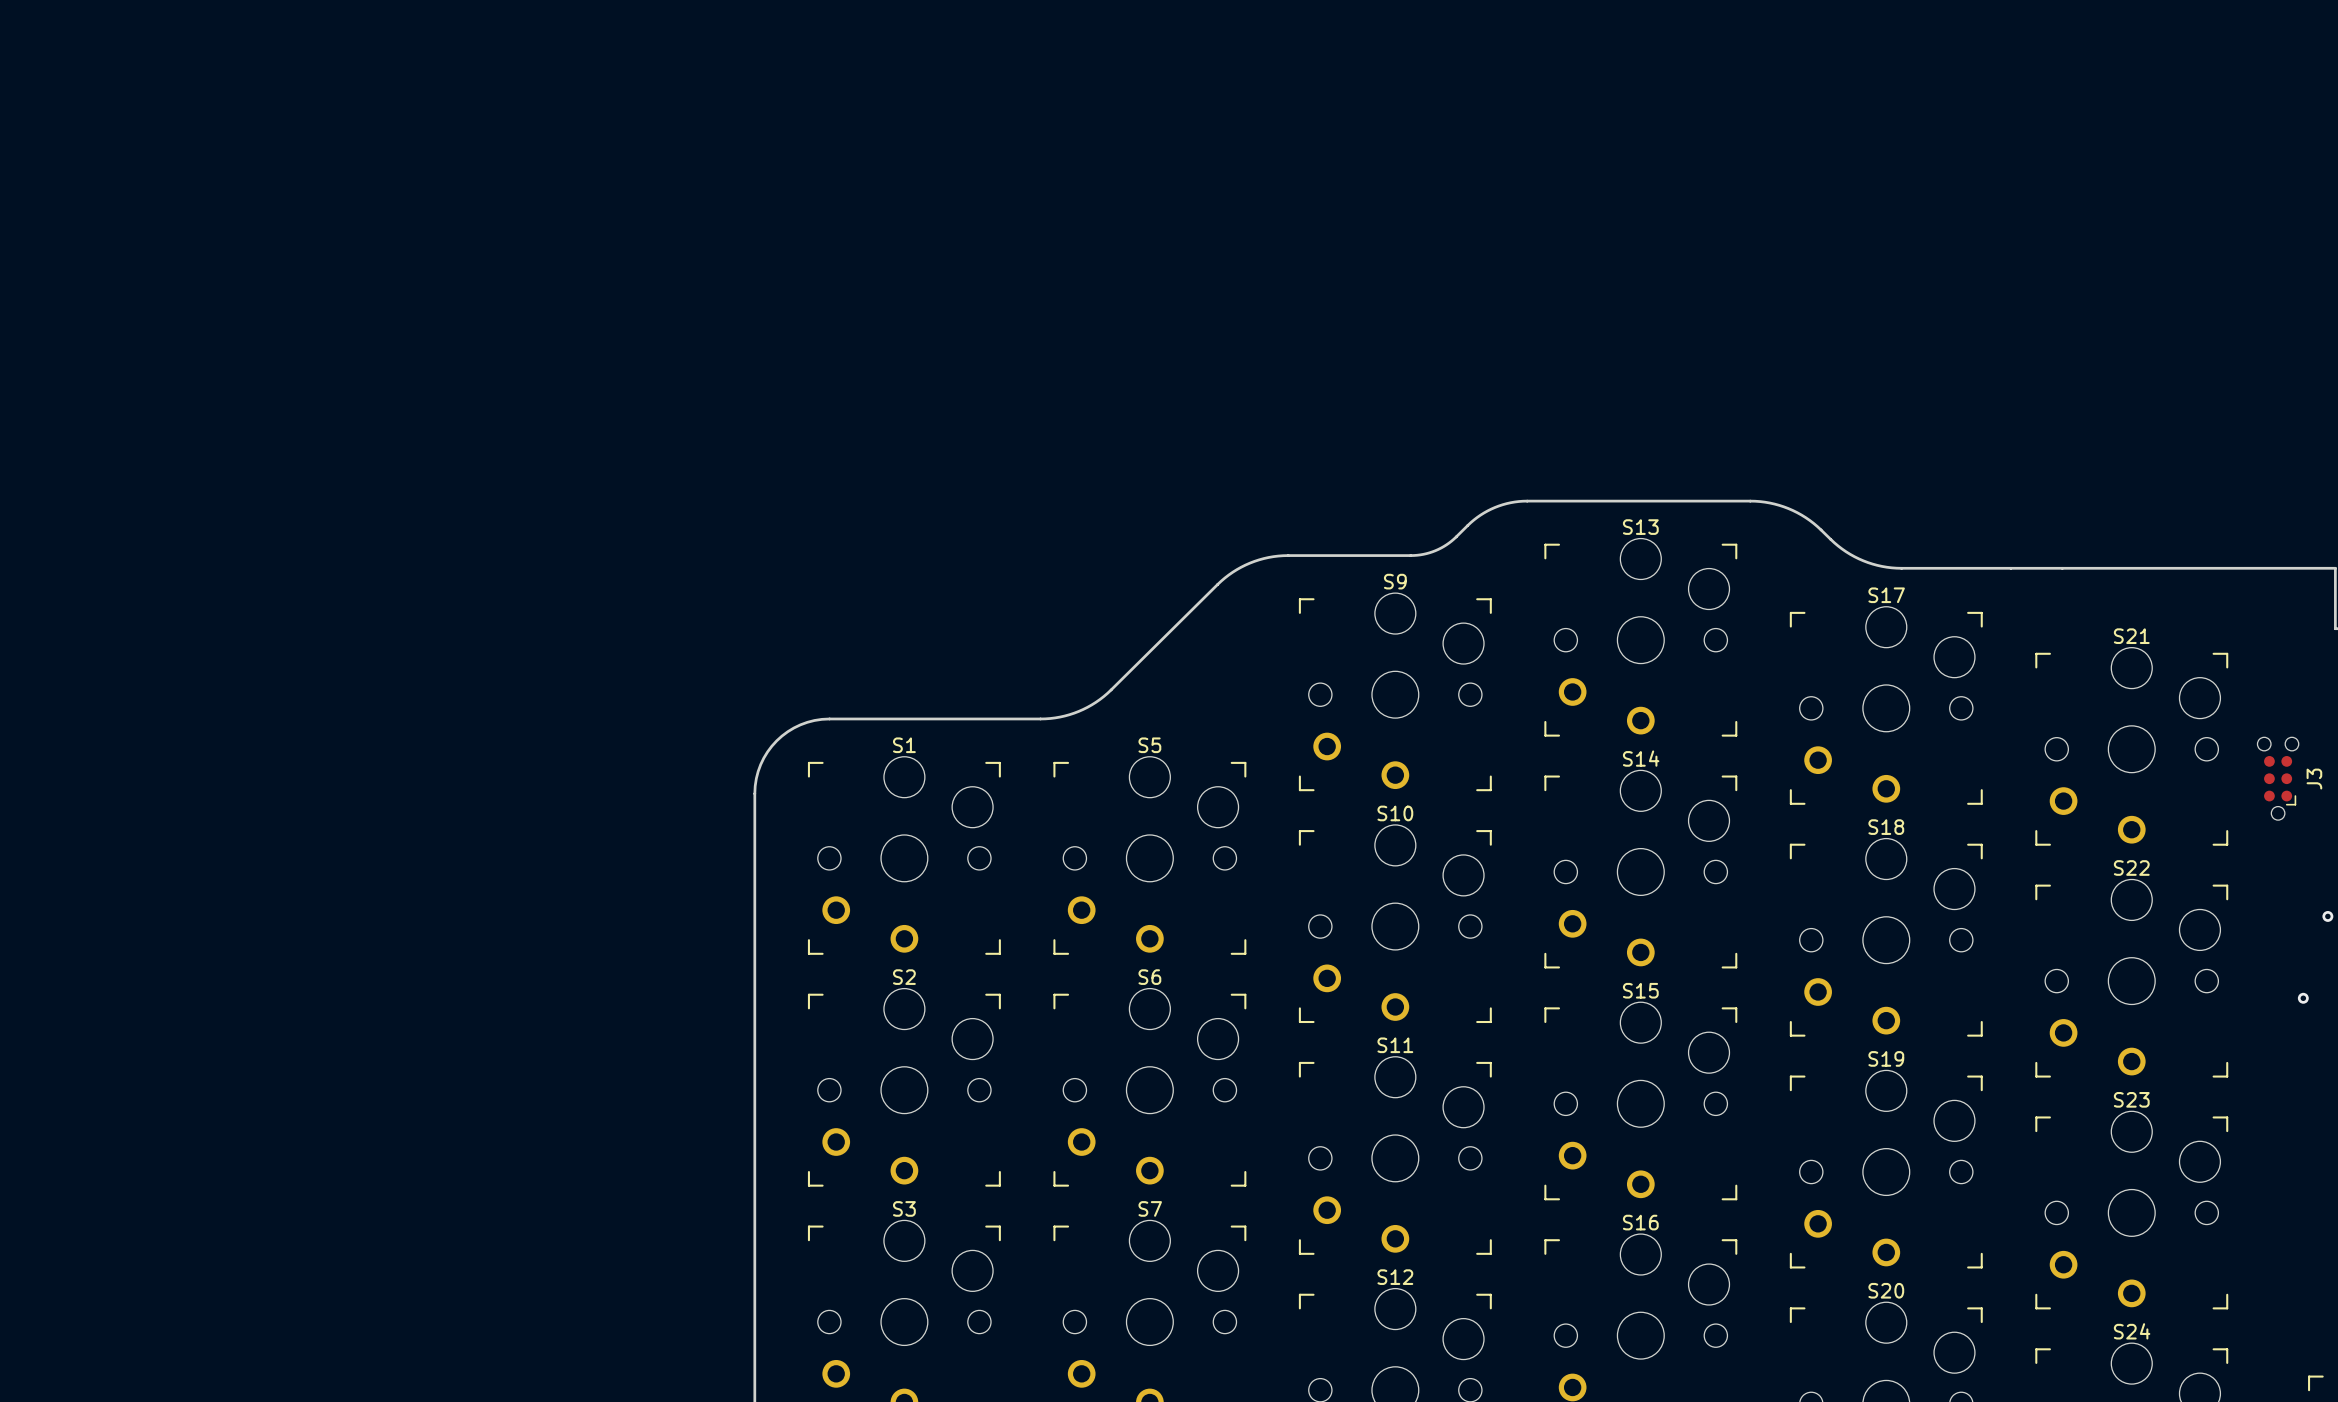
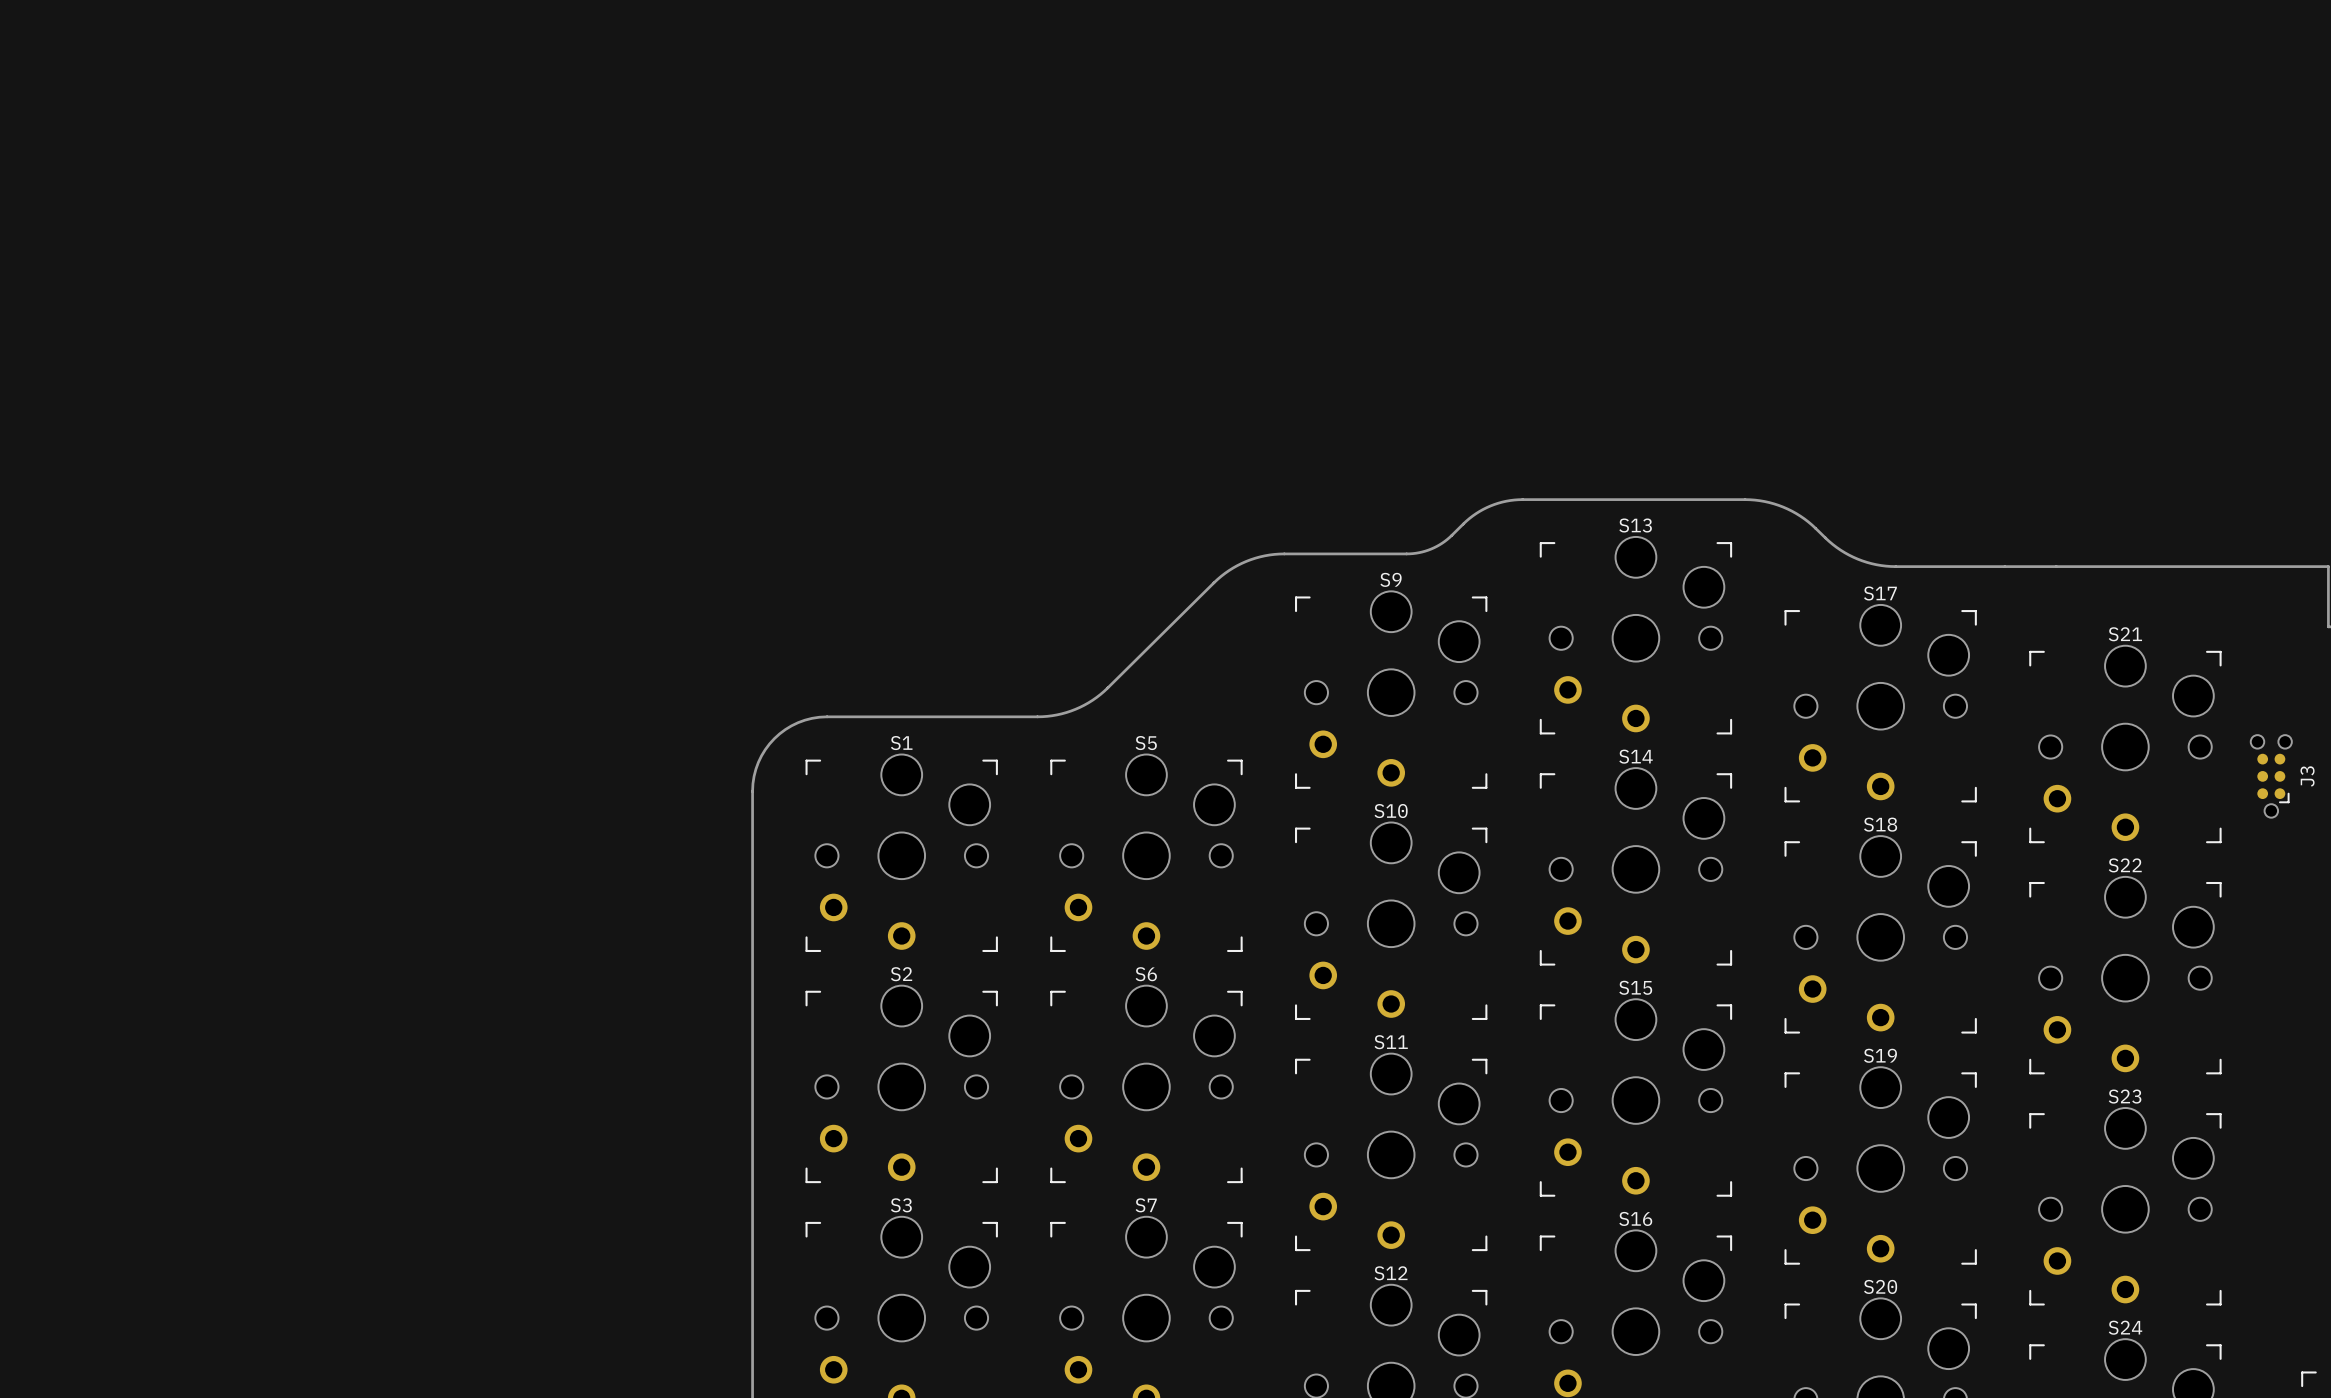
via: (2327, 916) -> none
via: (2303, 998) -> none

